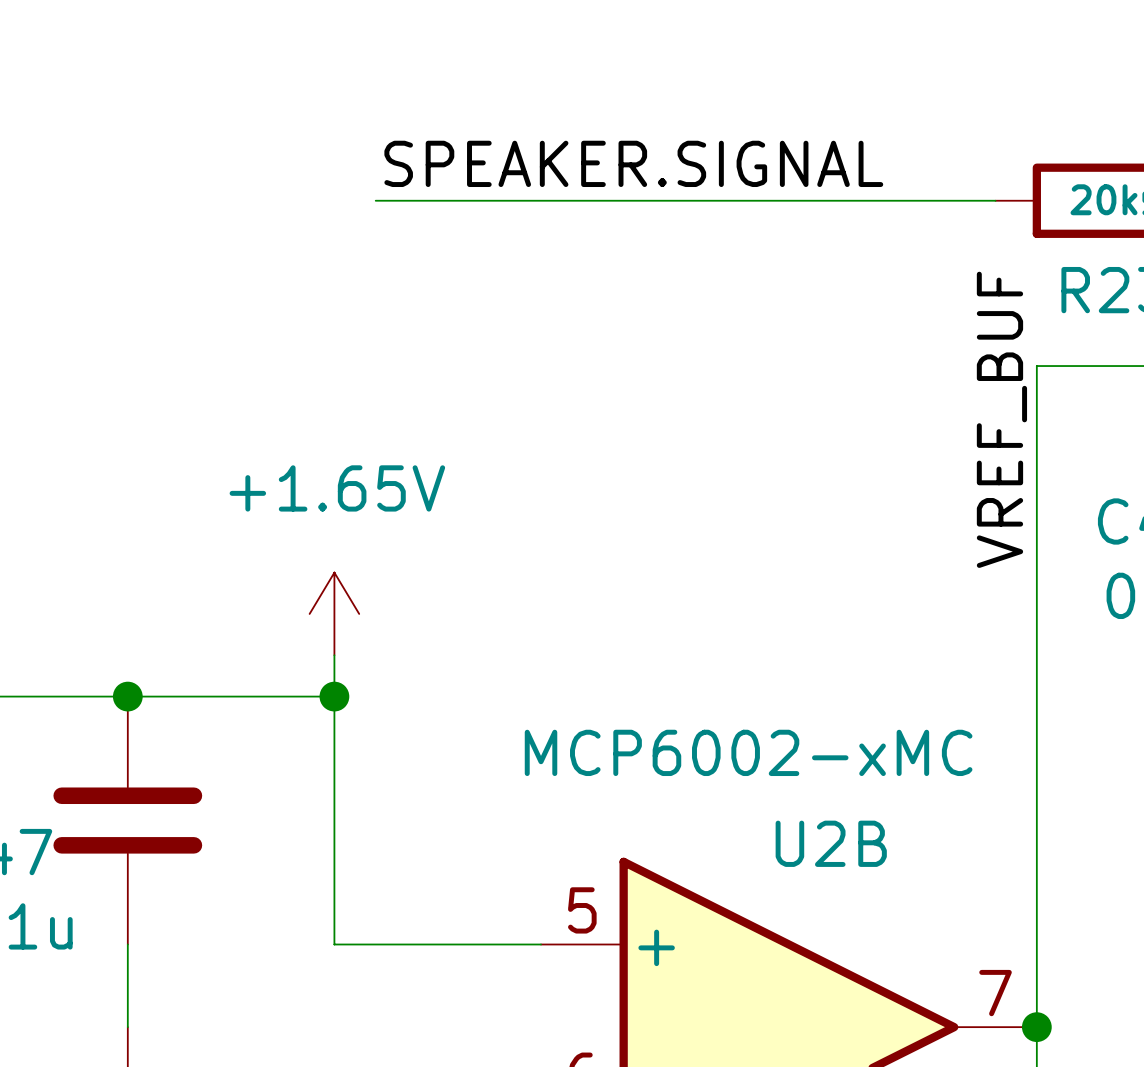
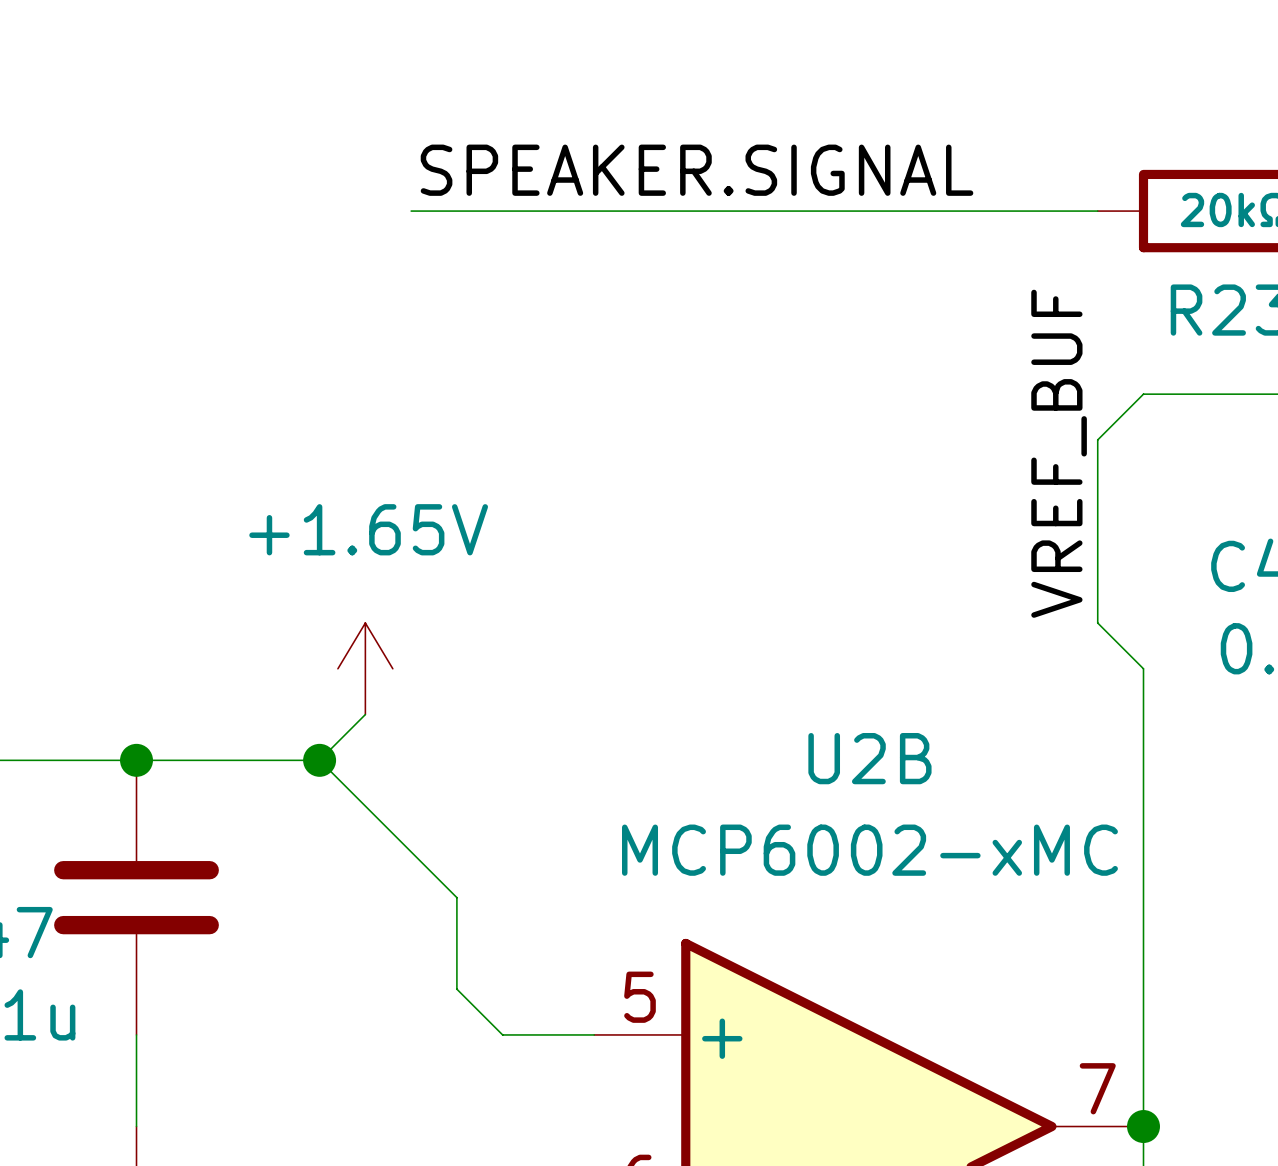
wire: (1036, 366) (1036, 613) -> (1143, 394) (1097, 439) (1097, 623) (1143, 668)
label position: VREF_BUF (1001, 419) -> VREF_BUF (1059, 453)
wire: (334, 655) (334, 944) (458, 944) -> (365, 714) (319, 760) (456, 897) (456, 989) (502, 1034)
wire: (293, 696) (334, 696) -> none
junction position: (334, 696) -> (319, 760)
U2B value position: MCP6002-xMC (748, 752) -> MCP6002-xMC (869, 850)
U2B name position: U2B (831, 843) -> U2B (869, 758)

